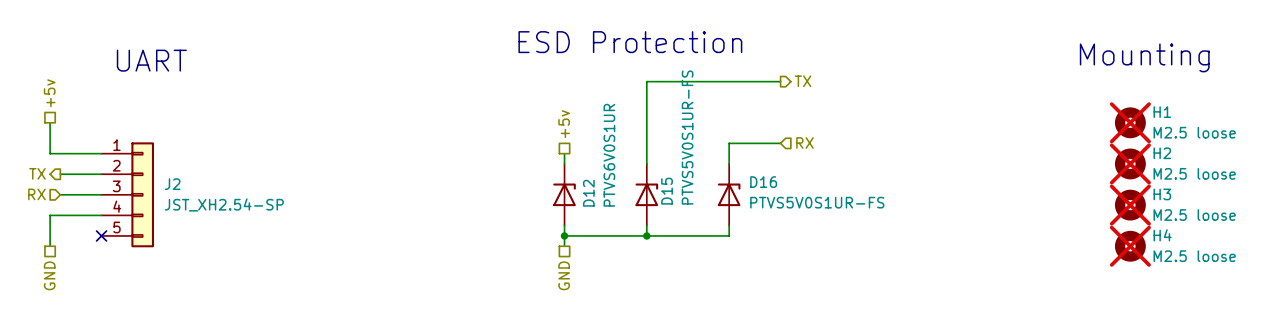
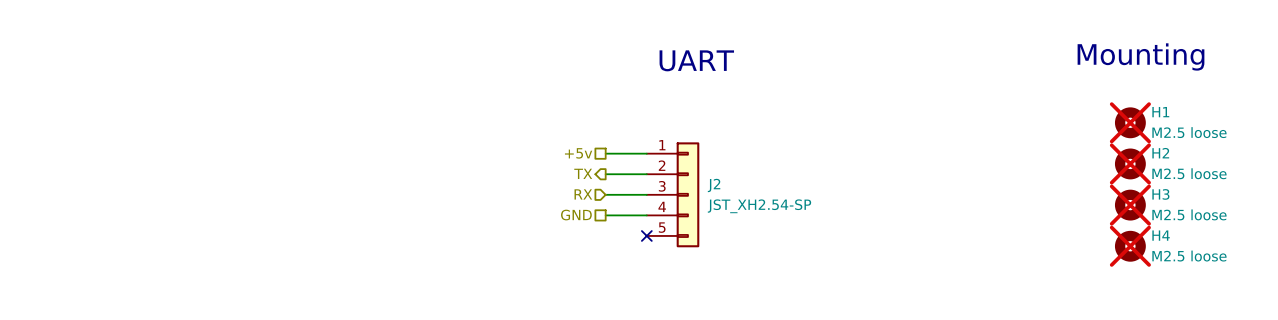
text: ESD Protection (630, 42) -> none
text: UART (151, 60) -> none
text: none -> UART (696, 60)
wire: (780, 81) (646, 81) (646, 163) -> none
hierarchical label: TX (803, 81) -> none
hierarchical label: +5v (49, 93) -> none
wire: (50, 122) (50, 153) (101, 153) -> none
hierarchical label rotation: 0° (564, 124) -> 90° counterclockwise (578, 153)
hierarchical label: RX (804, 142) -> none
wire: (780, 143) (729, 143) (729, 163) -> none
wire: (564, 153) (564, 163) -> none
wire: none -> (605, 153) (646, 153)
hierarchical label: TX (37, 173) -> none
hierarchical label: none -> TX (583, 173)
wire: (60, 174) (101, 174) -> none
wire: none -> (605, 174) (646, 174)
hierarchical label: RX (36, 194) -> none
wire: (60, 194) (101, 194) -> none
J2 position: (127, 194) -> (673, 194)
D12: PTVS6V0S1UR (564, 194) -> none
hierarchical label: none -> RX (583, 194)
wire: none -> (605, 194) (646, 194)
D15: PTVS5V0S1UR-FS (646, 194) -> none
D16: PTVS5V0S1UR-FS (729, 194) -> none
wire: (101, 215) (50, 215) (50, 246) -> none
wire: none -> (605, 215) (646, 215)
wire: (564, 225) (564, 246) -> none
wire: (646, 225) (646, 235) -> none
wire: (729, 225) (729, 235) (564, 235) -> none
no-connect mark: (101, 235) -> none
junction: (564, 235) -> none
junction: (646, 235) -> none
no-connect mark: none -> (646, 235)
hierarchical label: GND (49, 275) -> none
hierarchical label rotation: 0° (564, 275) -> 90° clockwise (576, 215)
hierarchical label position: GND (564, 275) -> GND (576, 215)

